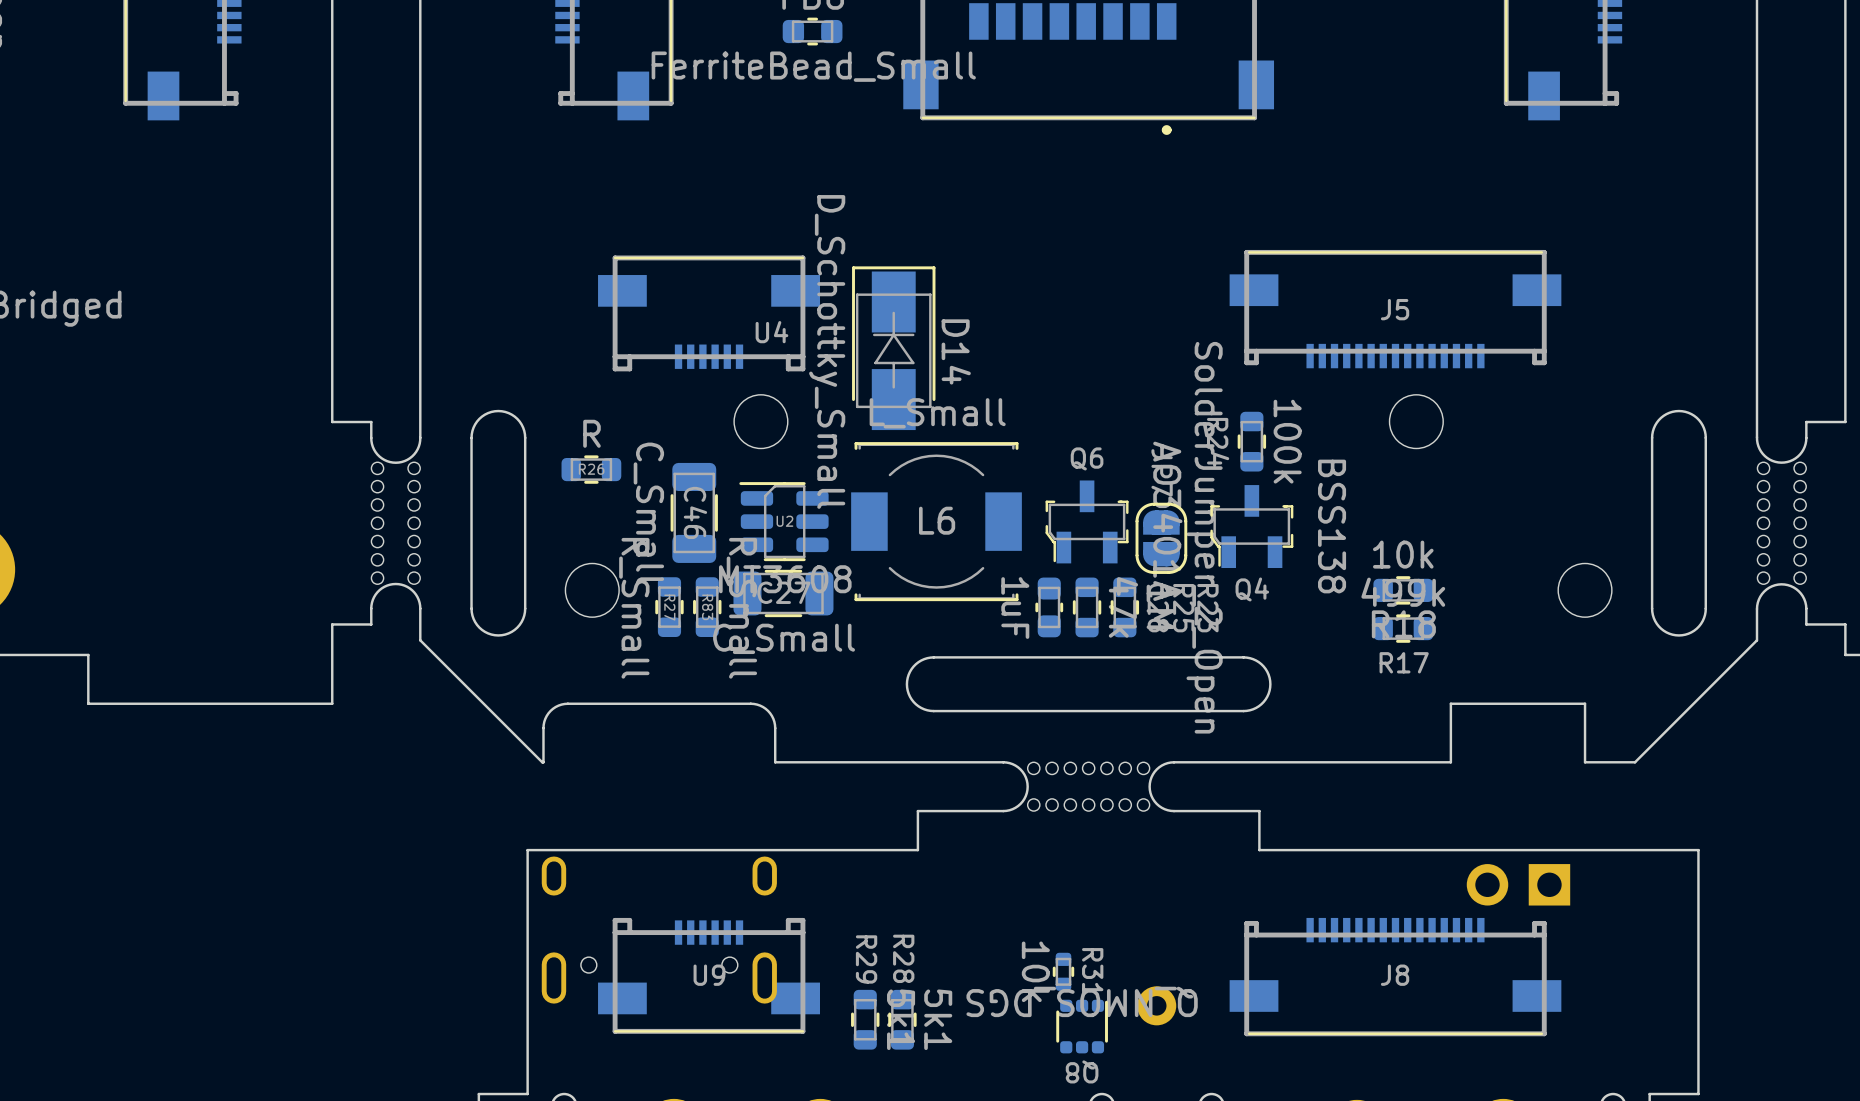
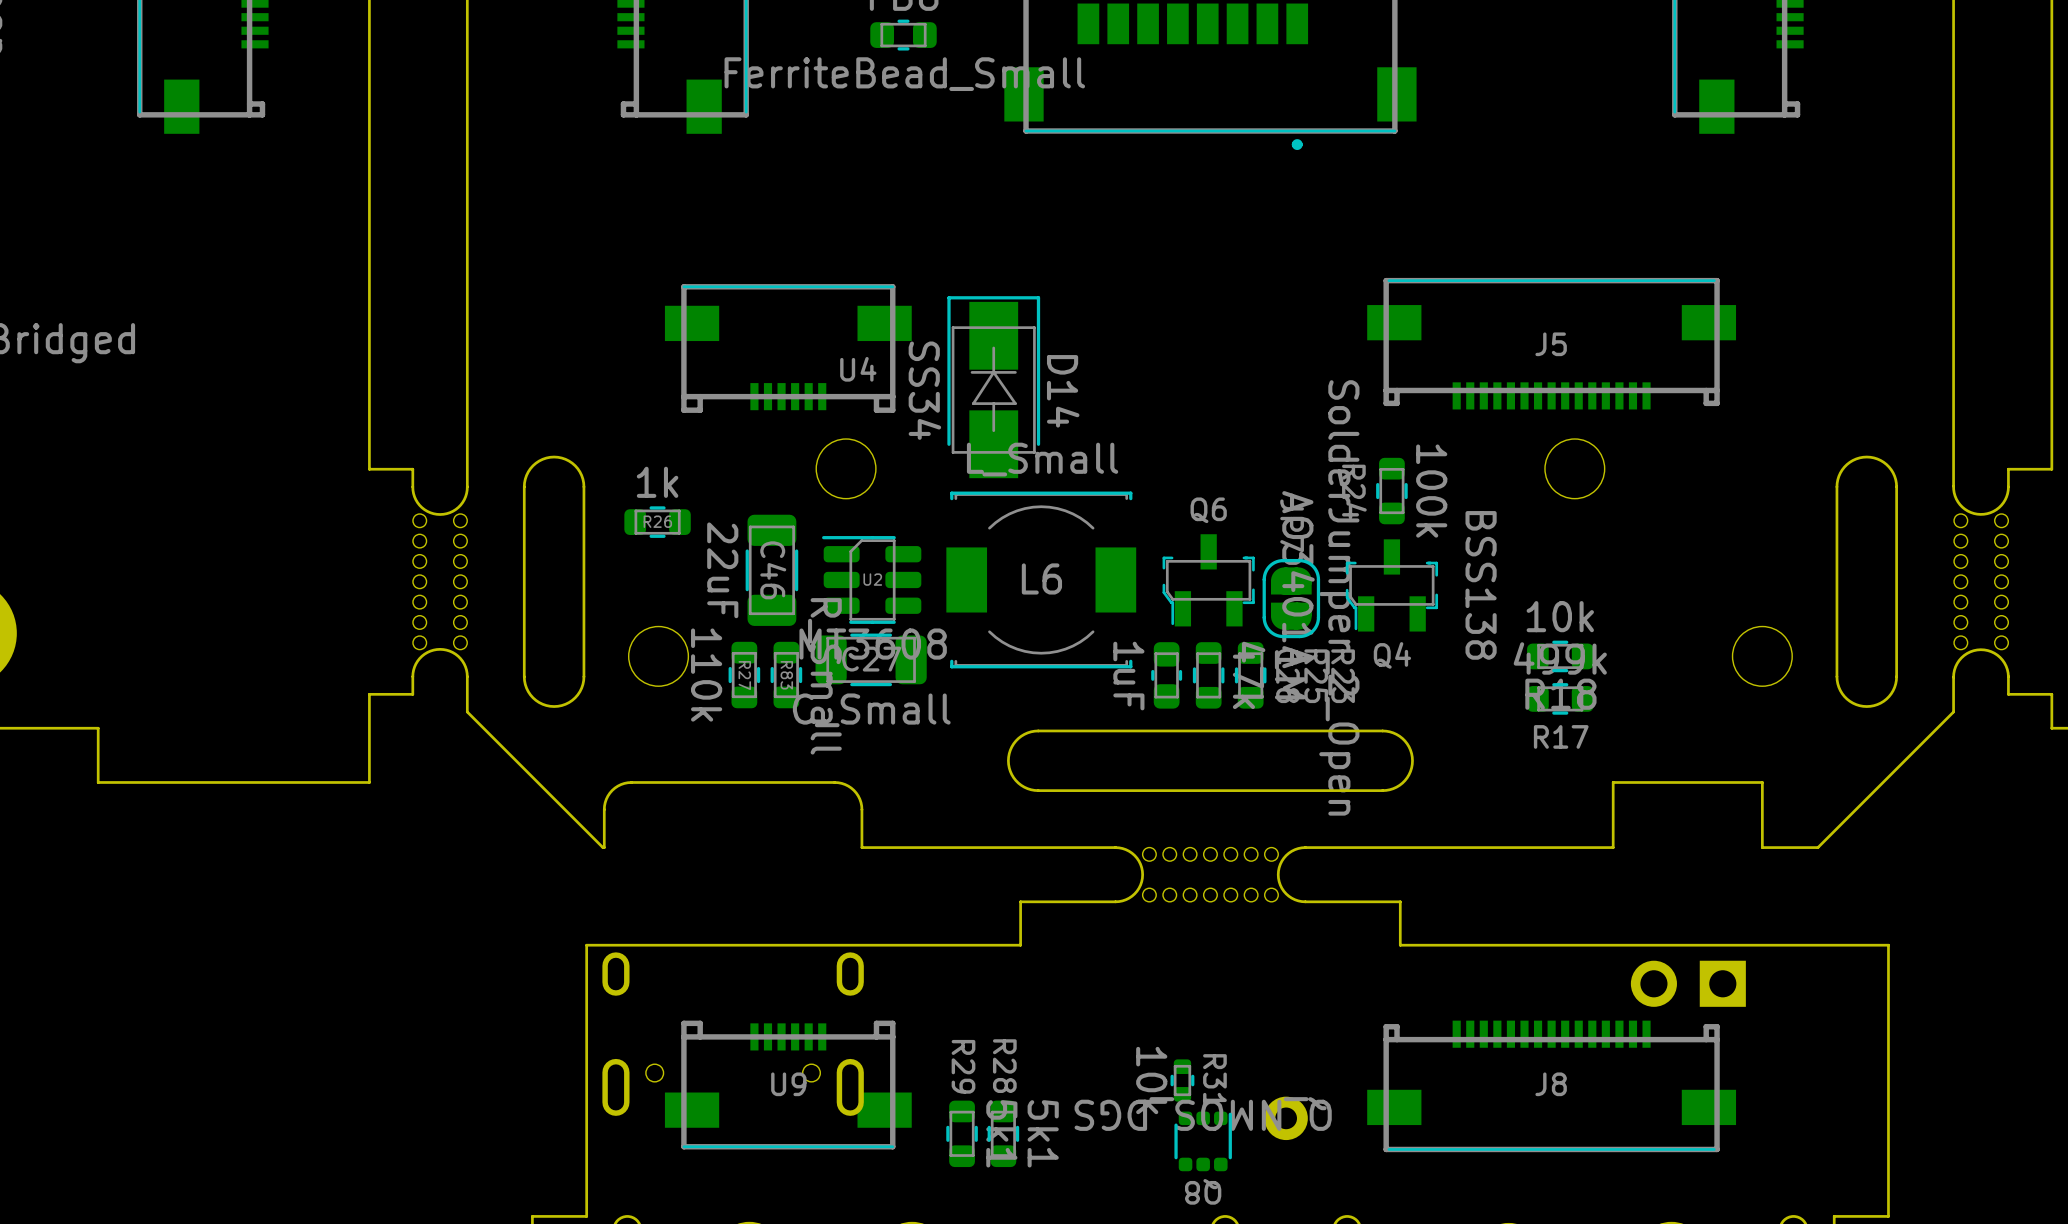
D14 value: D_Schottky_Small (827, 351) -> SS34 (924, 390)
R26 value: R (591, 433) -> 1k (657, 482)
C46 value: C_Small (648, 513) -> 22uF (722, 570)
R27 value: R_Small (634, 608) -> 110k (706, 675)

